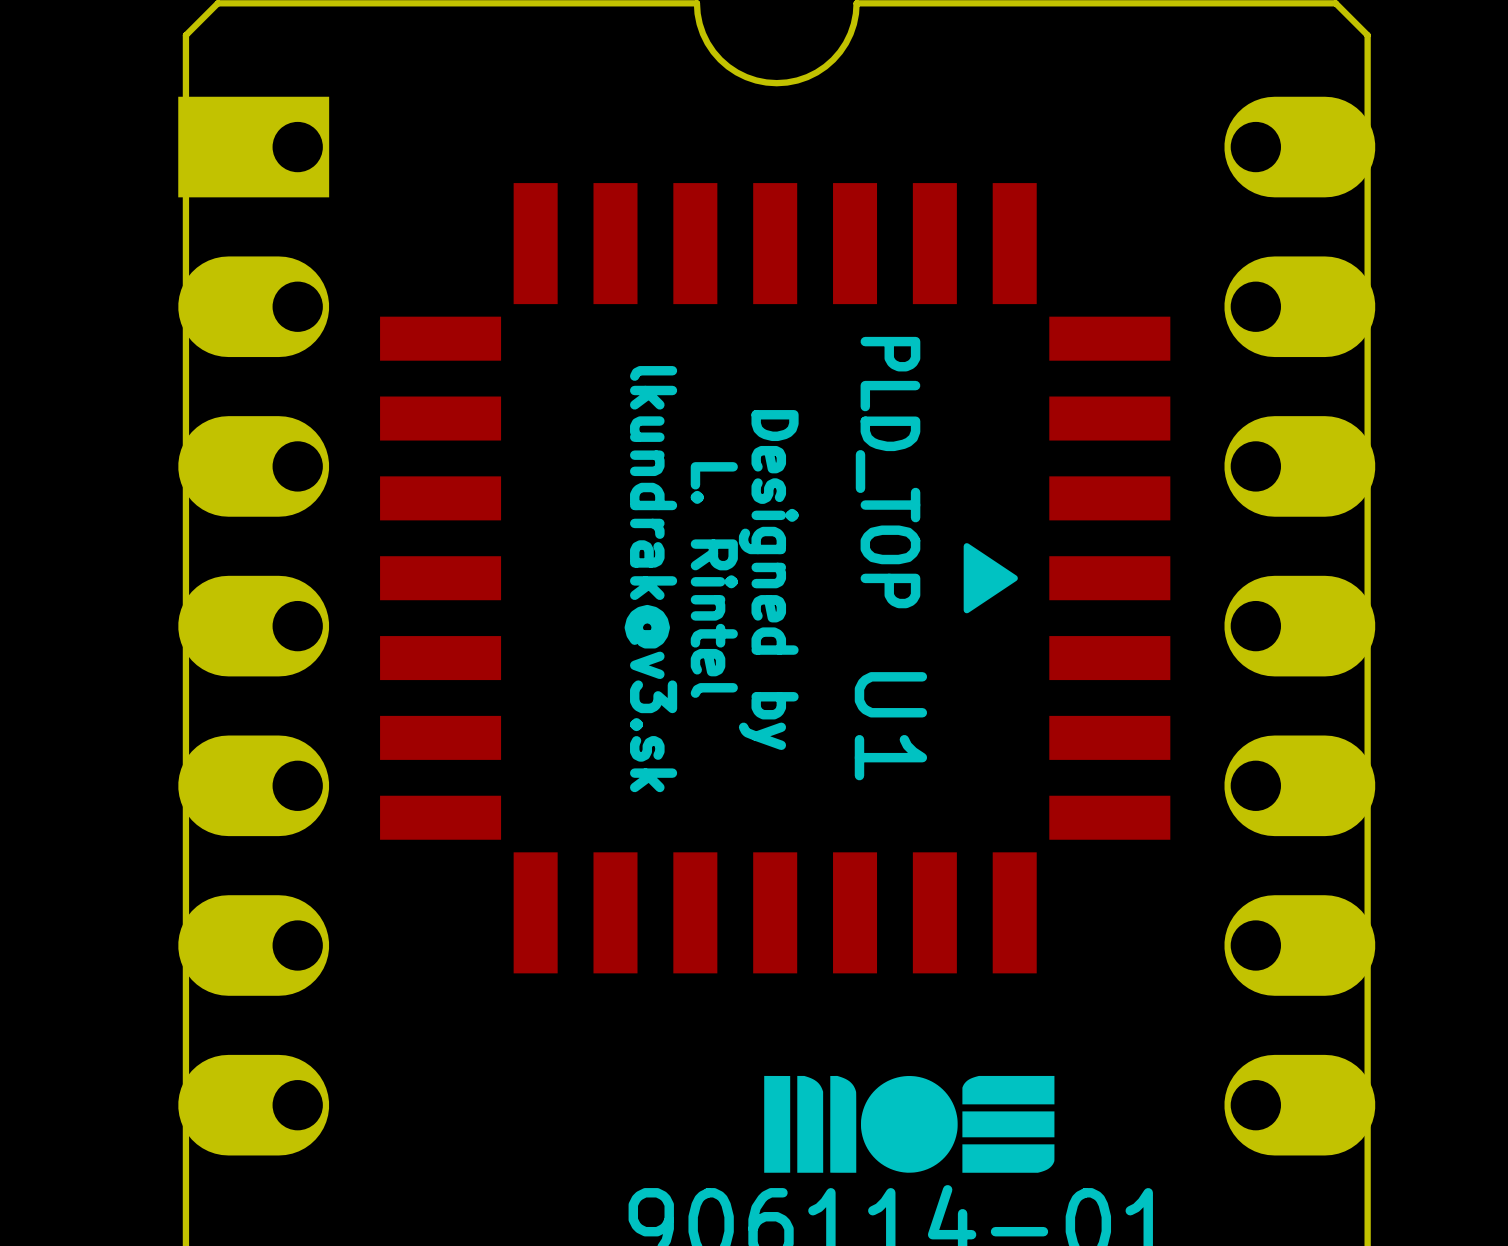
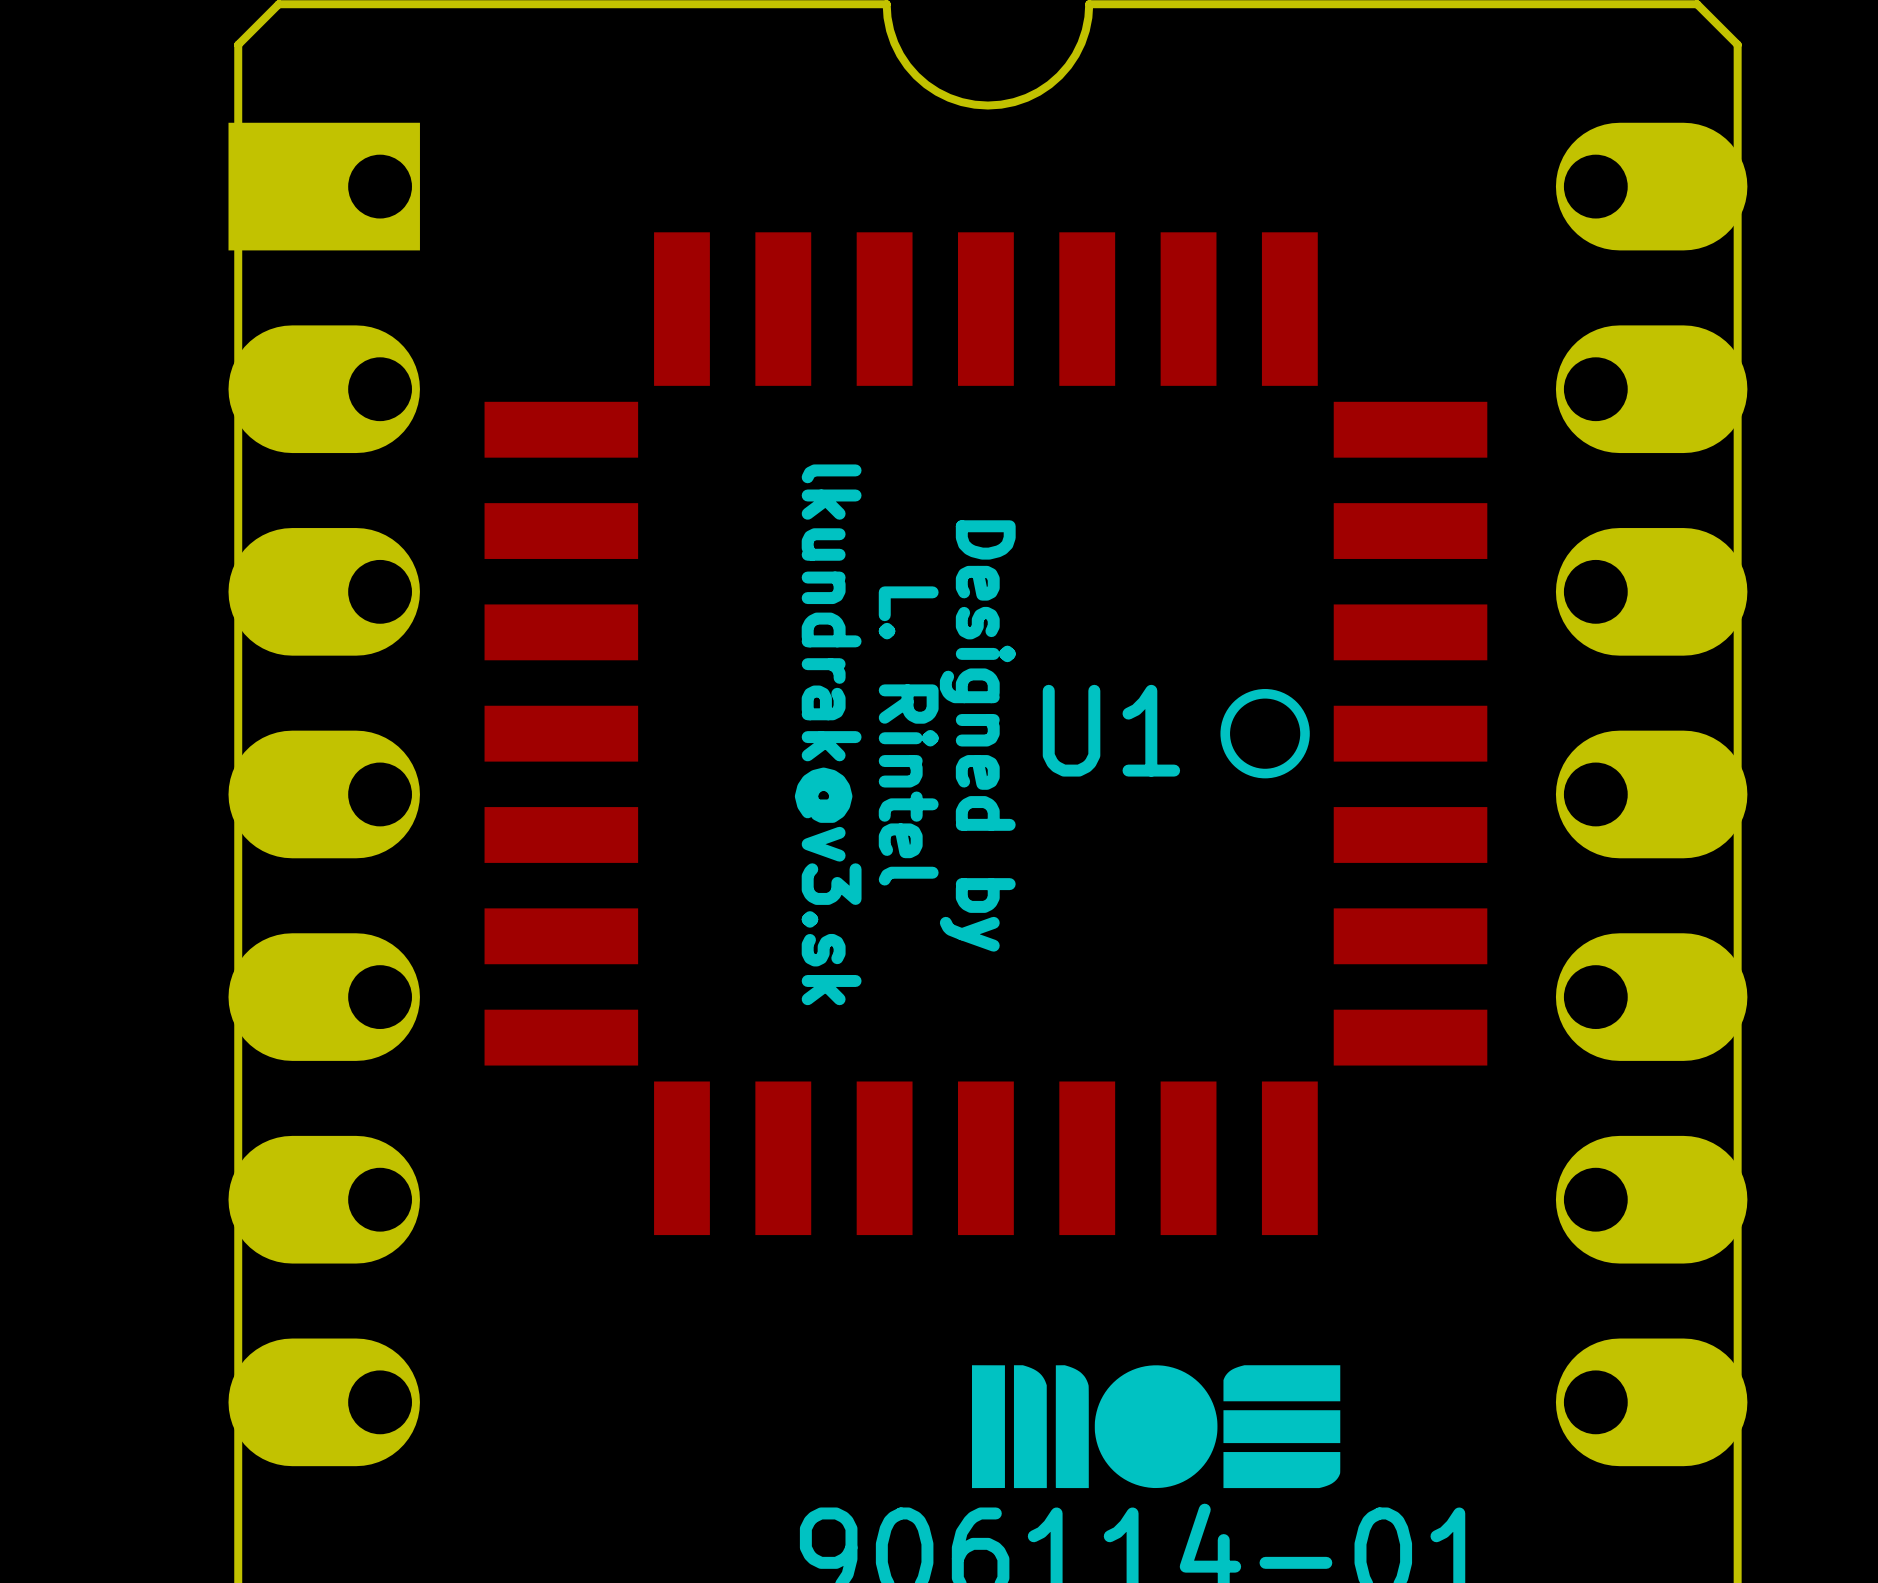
U1 footprint: [380, 183, 1171, 974] -> [484, 232, 1488, 1236]
U1 value: PLD_TOP (888, 472) -> none
U1 name rotation: 0° (890, 726) -> 90° counterclockwise (1111, 730)

